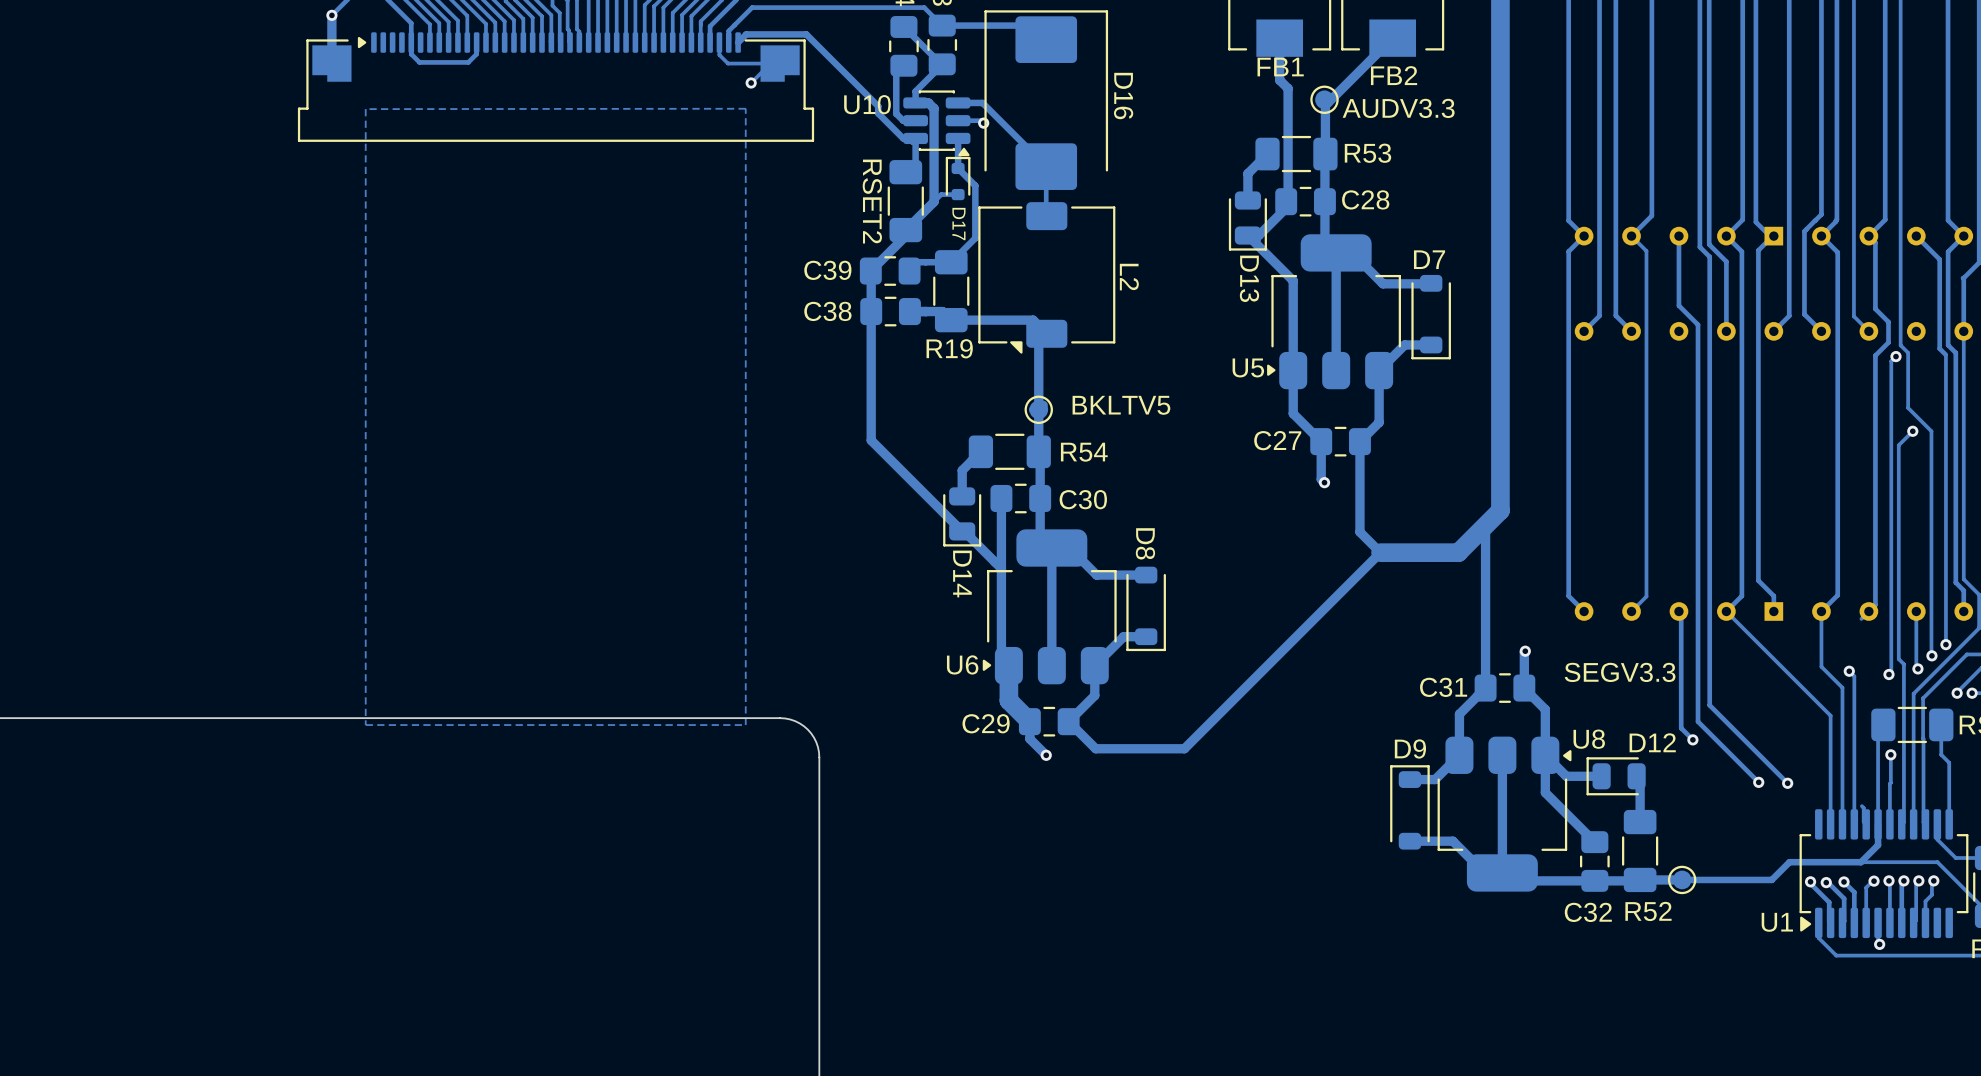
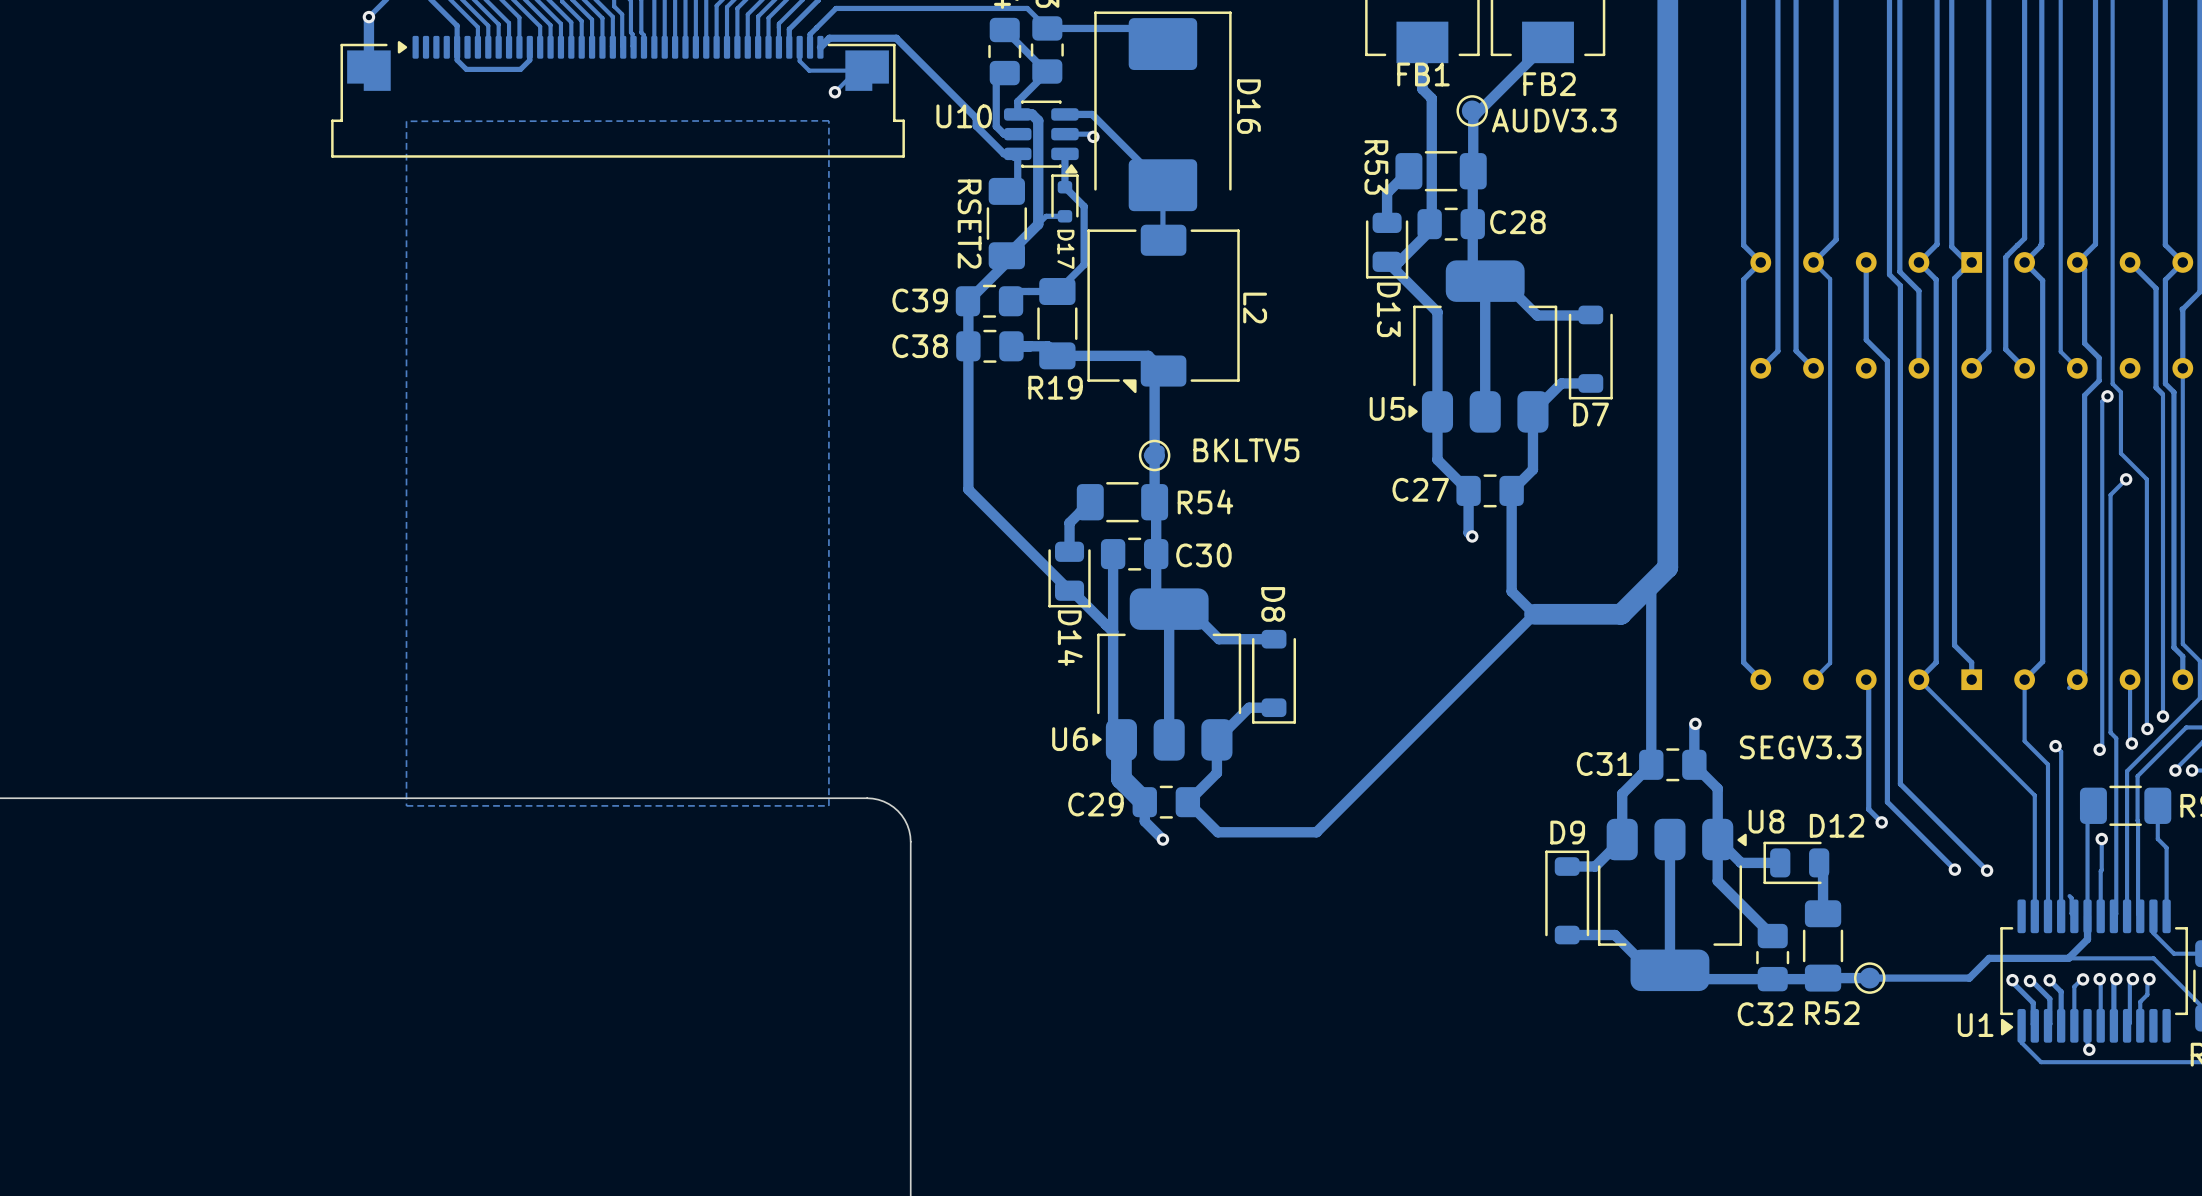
R53 name rotation: 0° (1367, 153) -> 90° clockwise (1376, 167)
R53 name position: R53 (1367, 153) -> R53 (1376, 167)
D7 name position: D7 (1429, 259) -> D7 (1591, 414)

